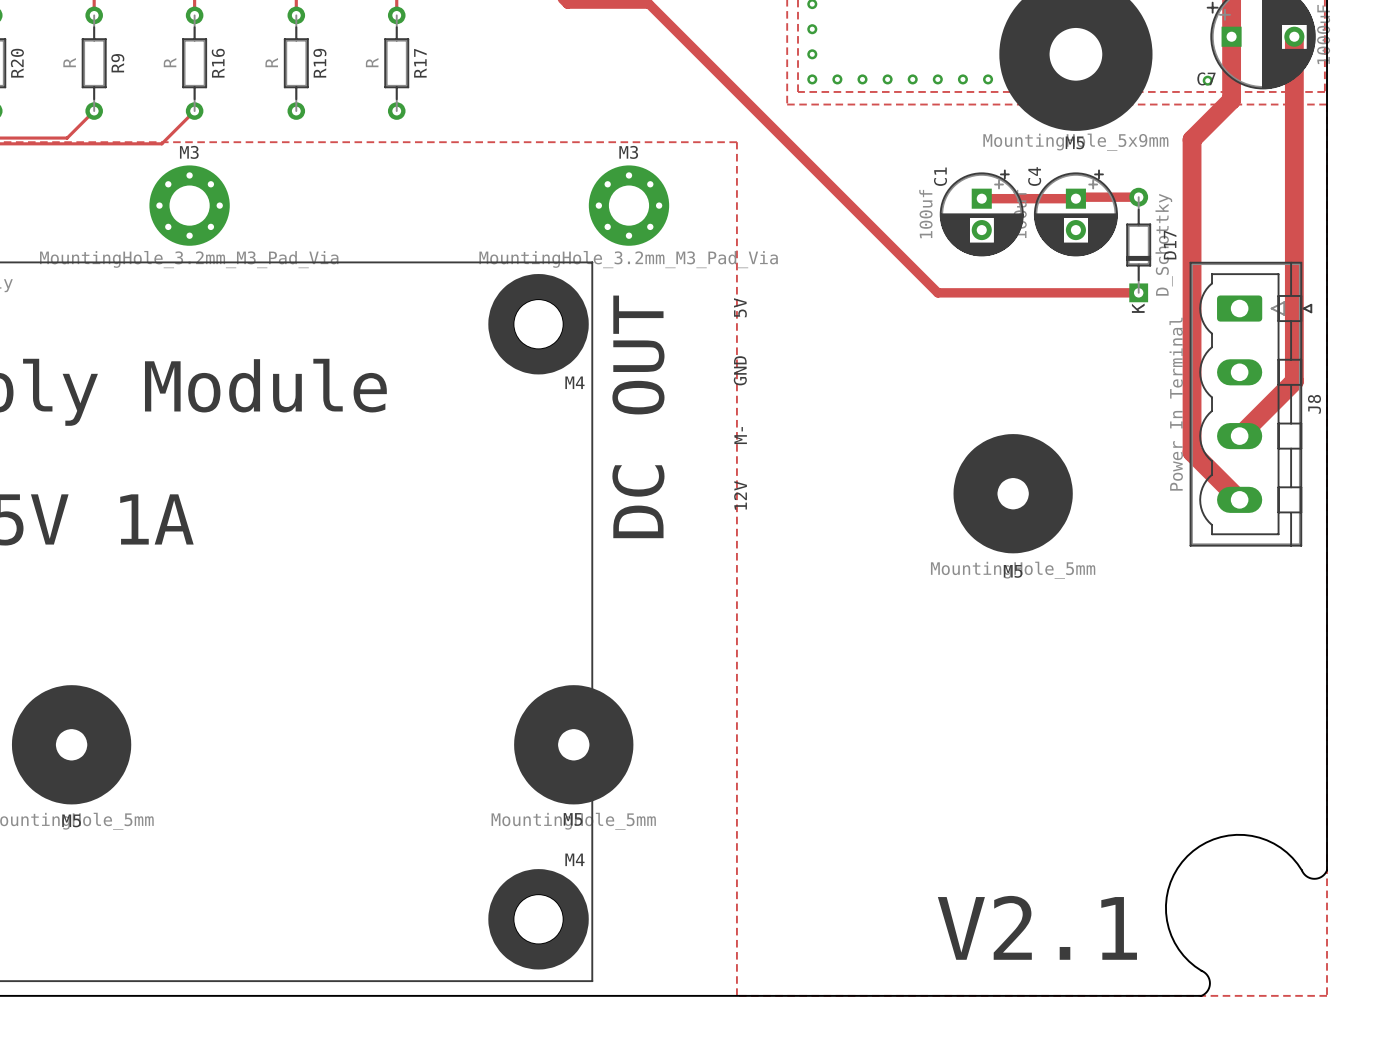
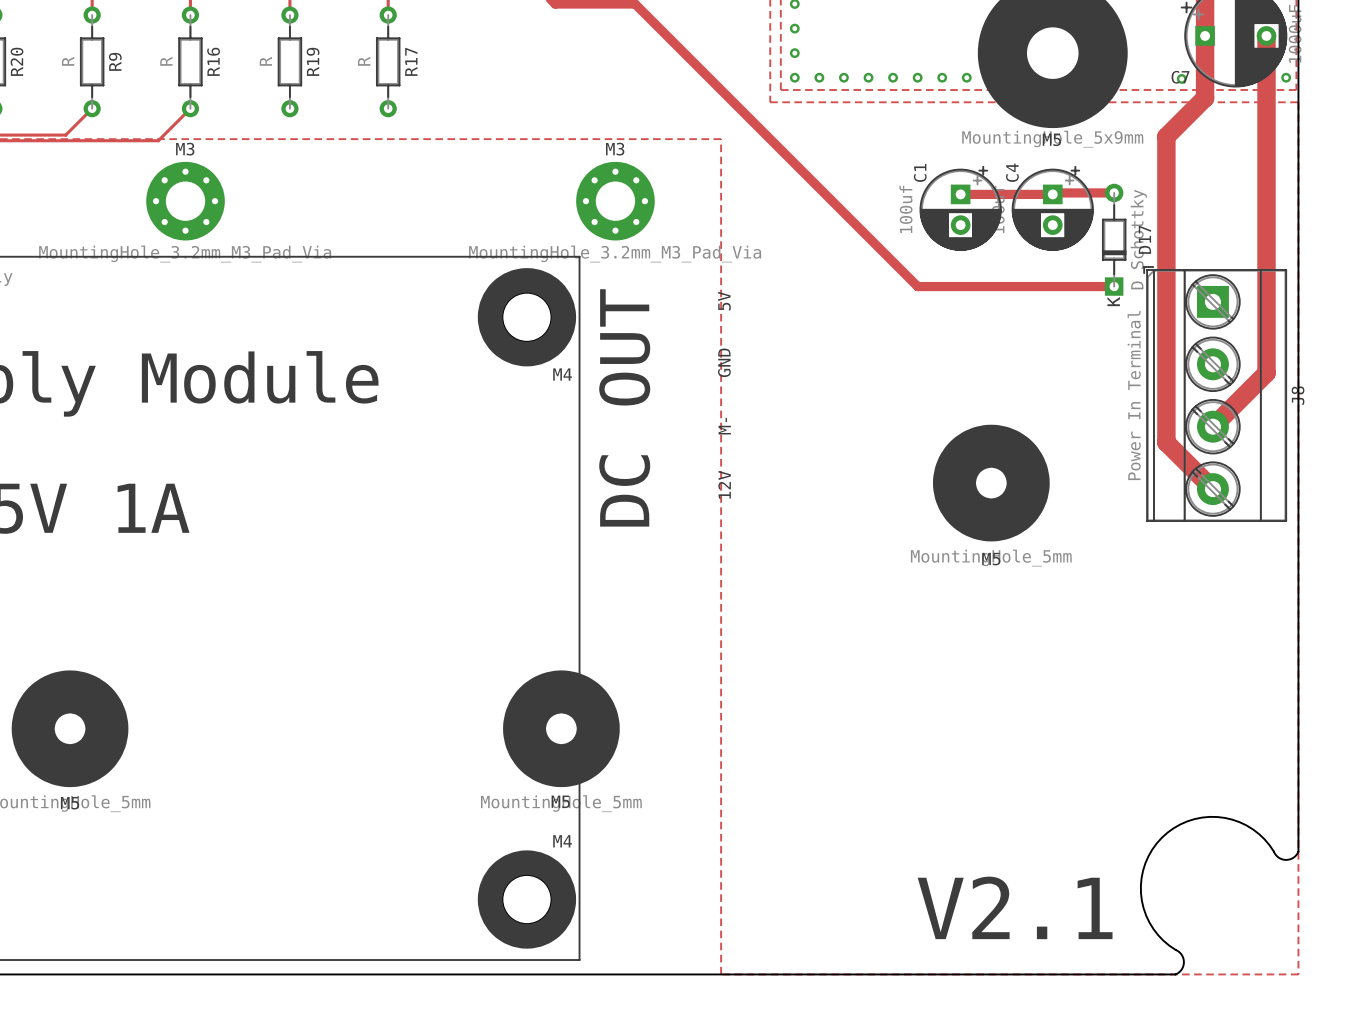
via: none -> (1286, 77)
J8 footprint: [1189, 261, 1313, 547] -> [1143, 266, 1287, 522]

